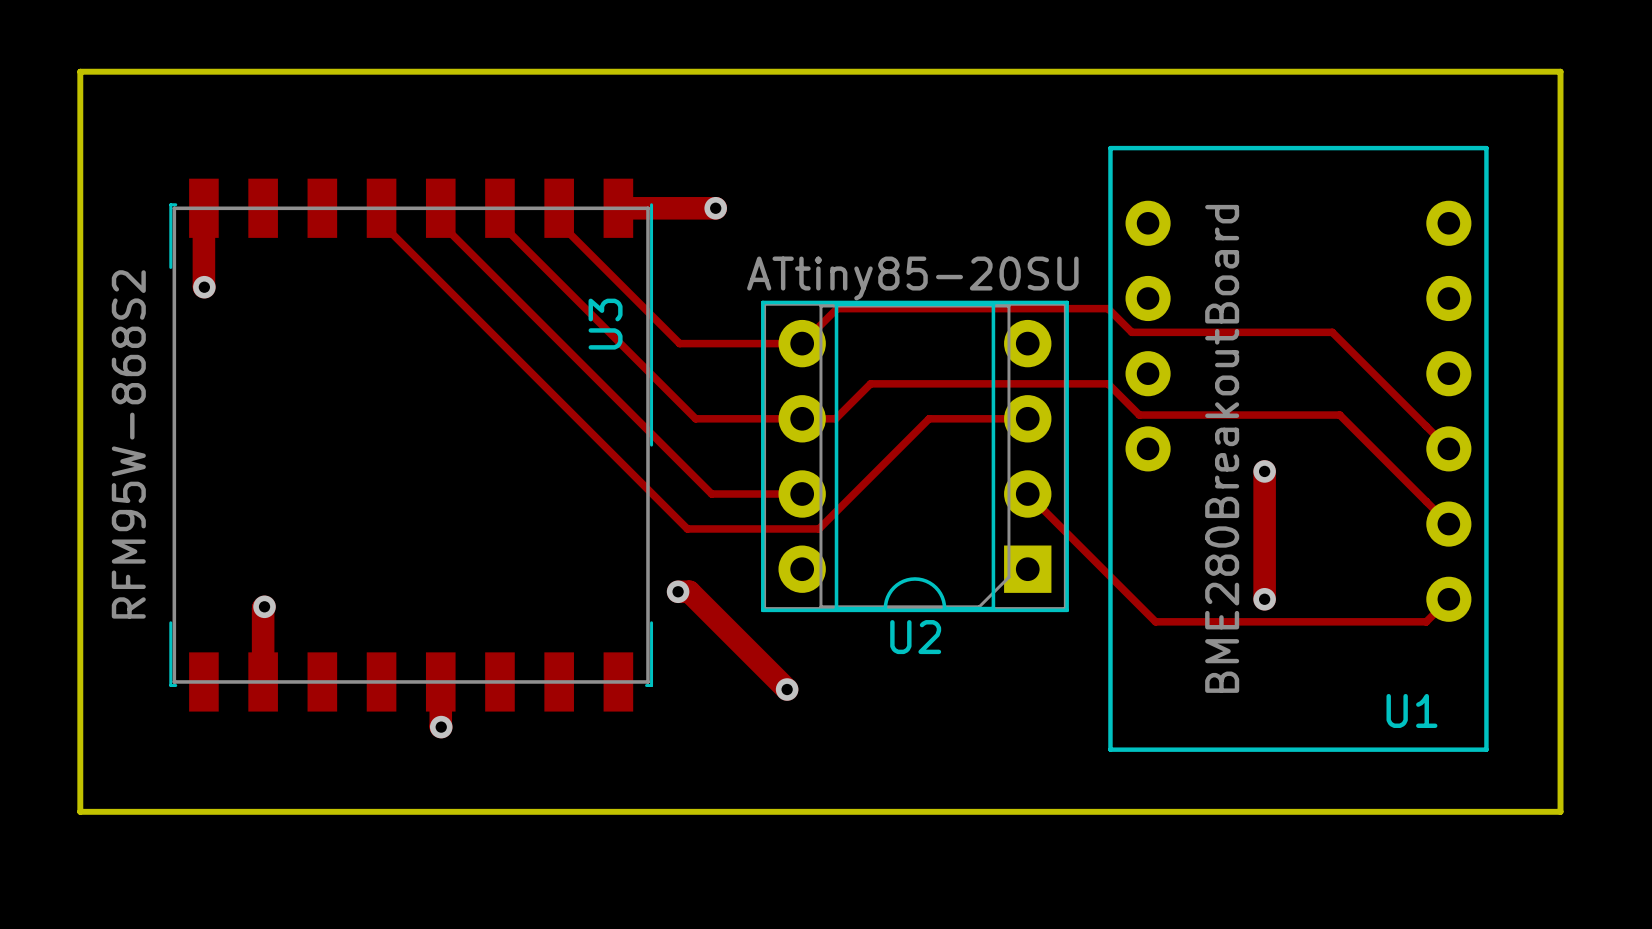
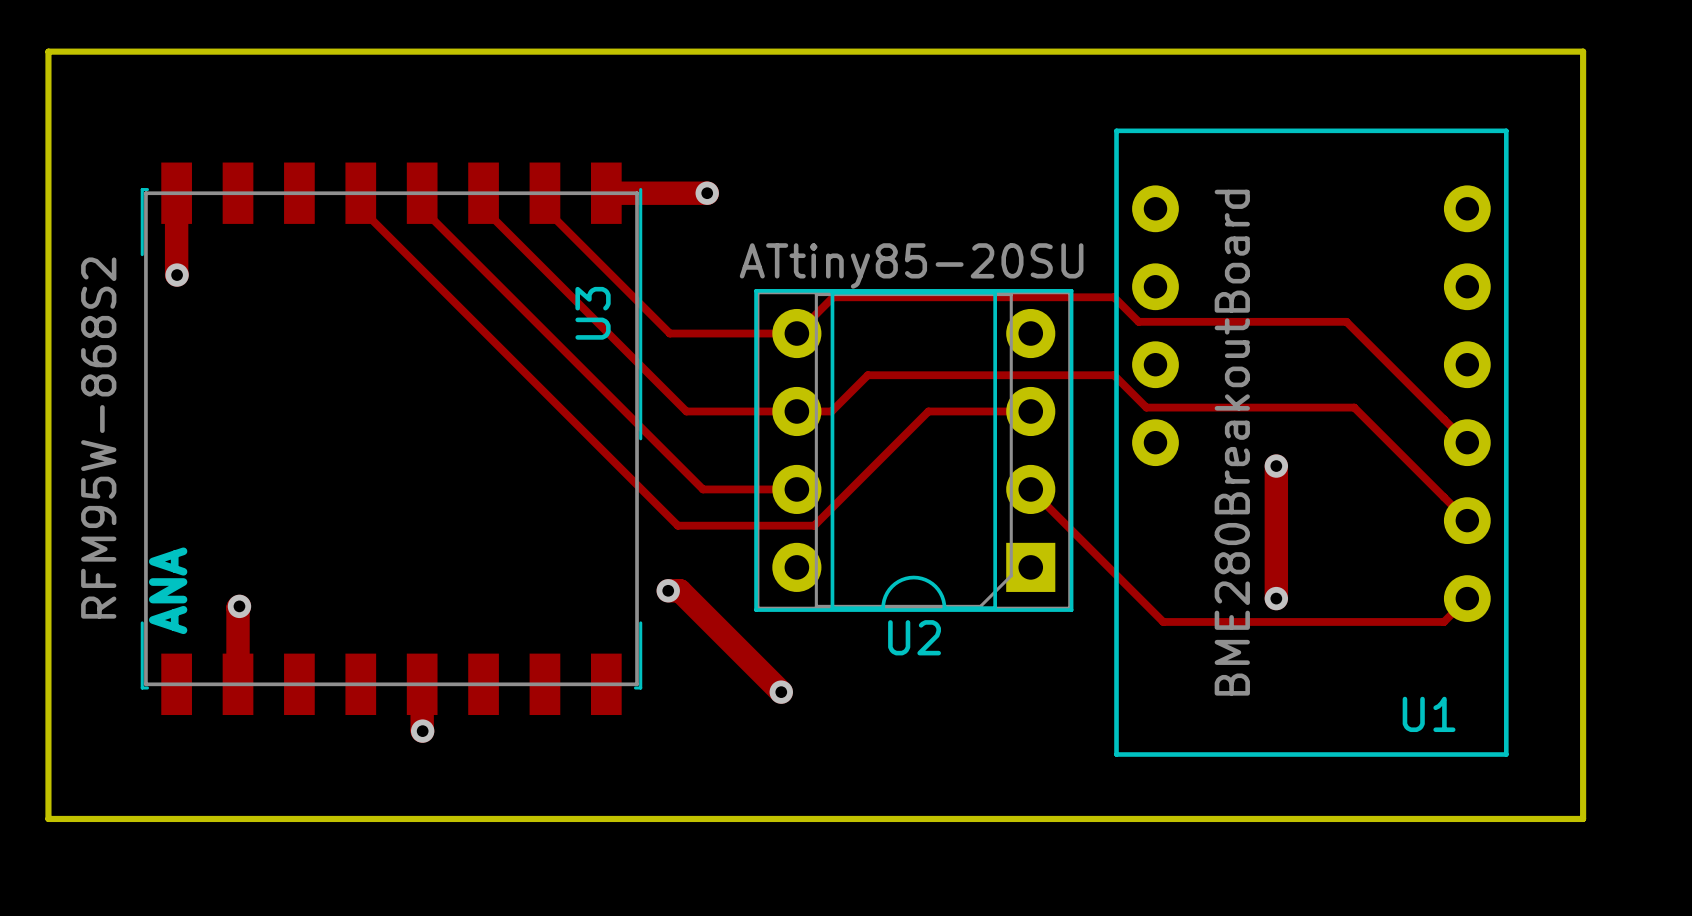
text: none -> ANA (168, 590)

